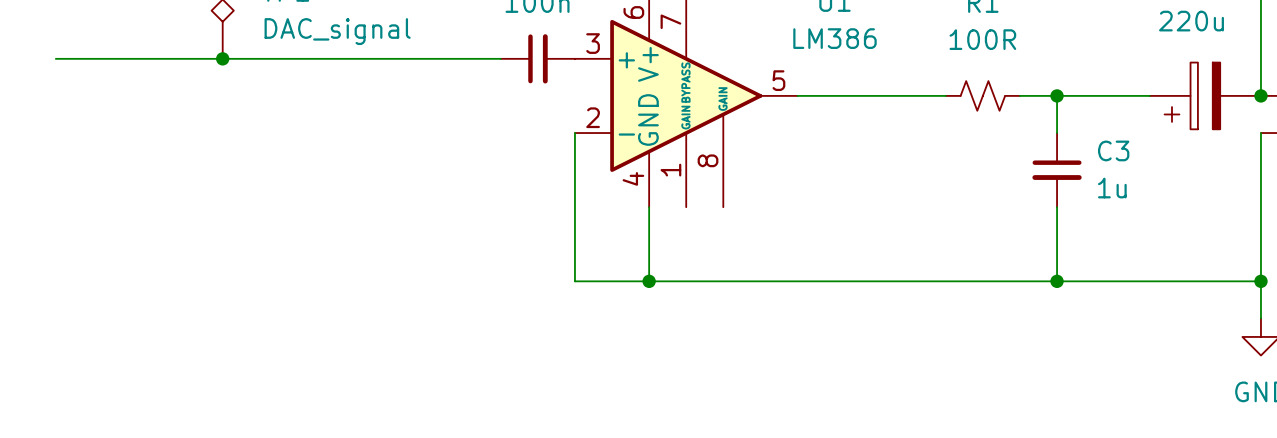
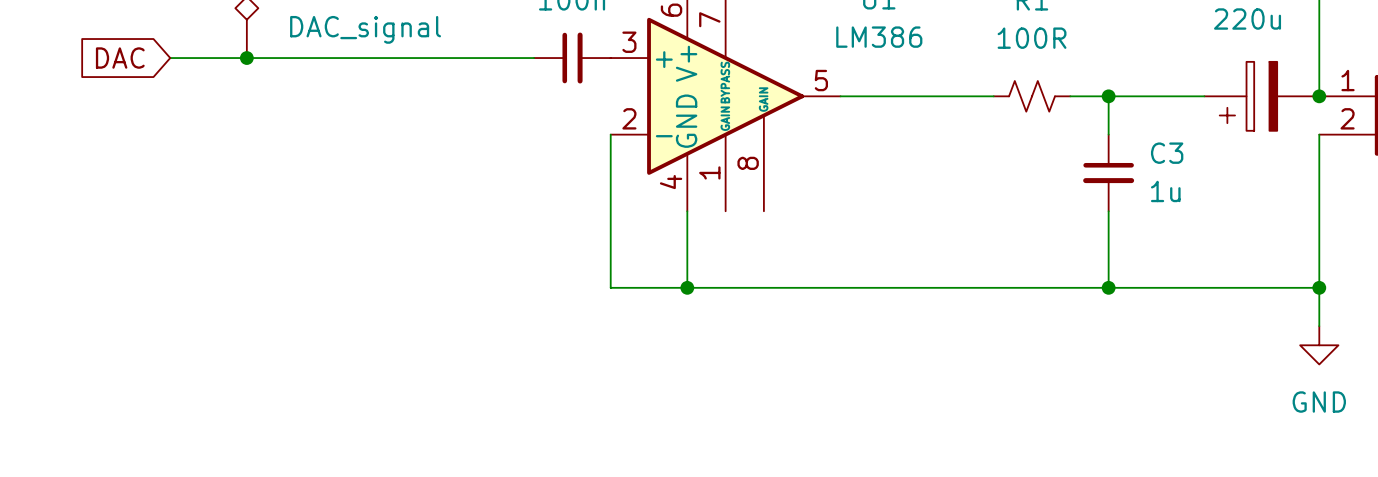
wire: (55, 58) (148, 58) -> none
global label: none -> DAC (120, 58)

